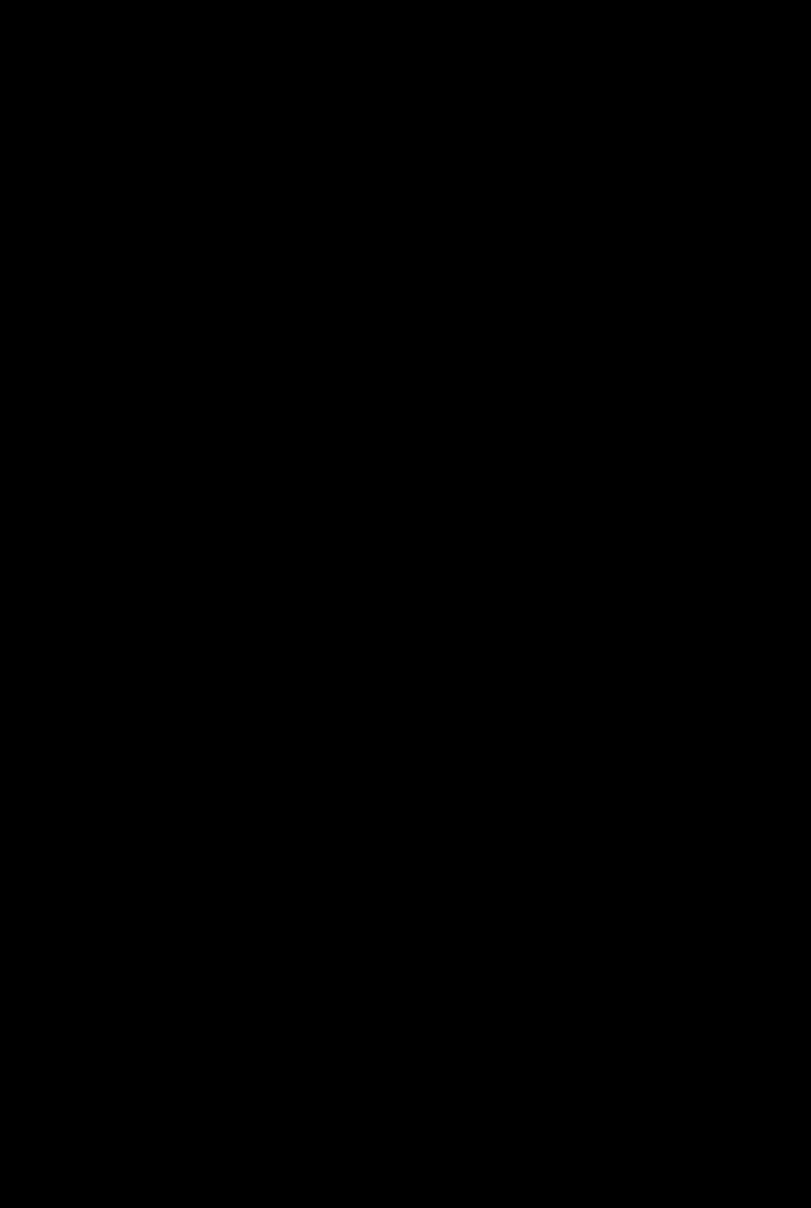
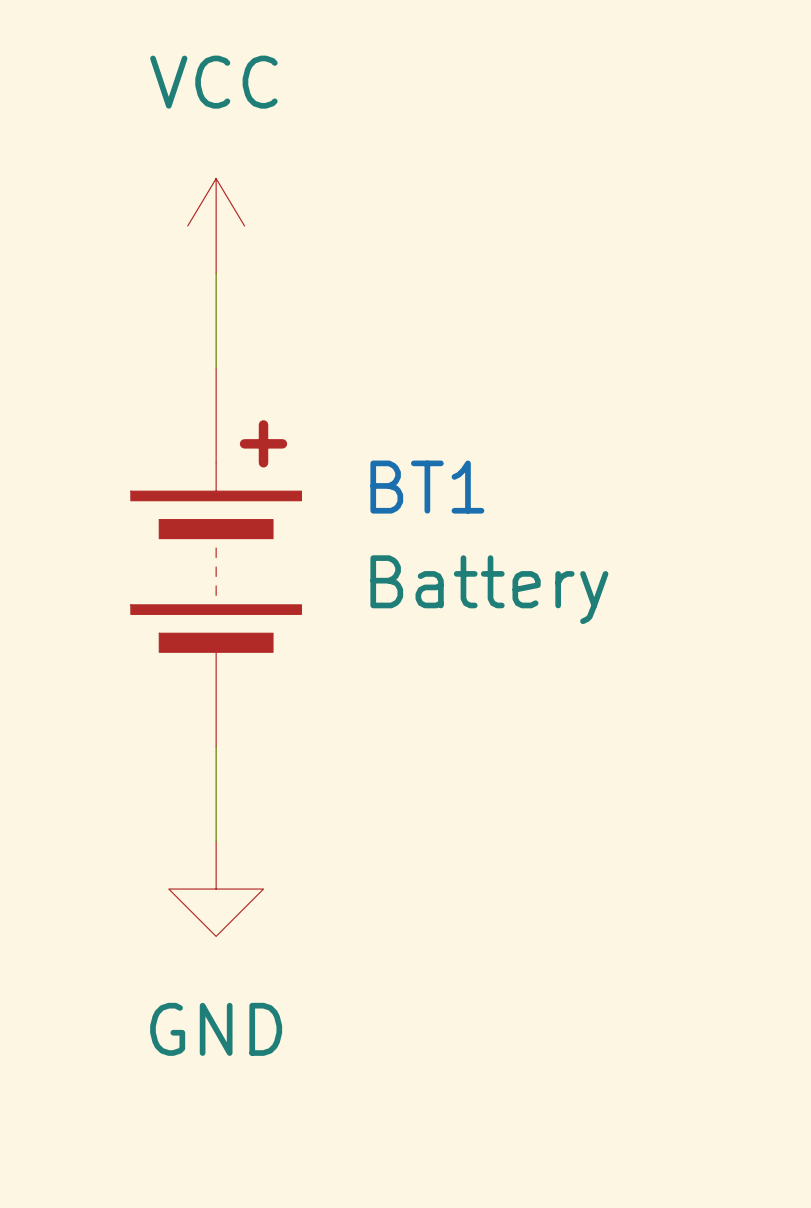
power symbol: none -> VCC (216, 225)
wire: none -> (216, 273) (216, 368)
BT1: none -> Battery (216, 557)
wire: none -> (216, 746) (216, 841)
power symbol: none -> GND (216, 889)

